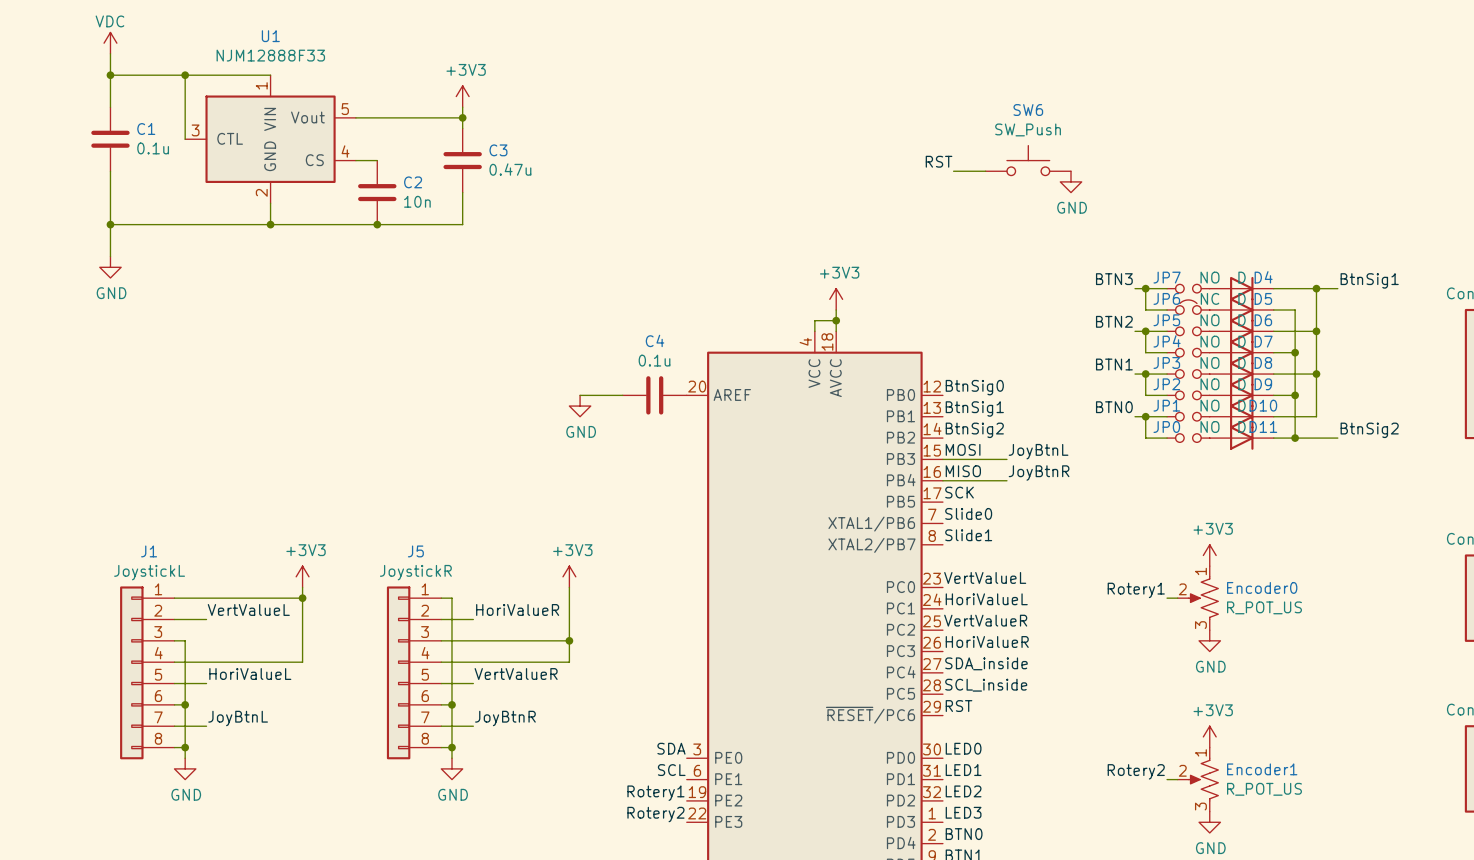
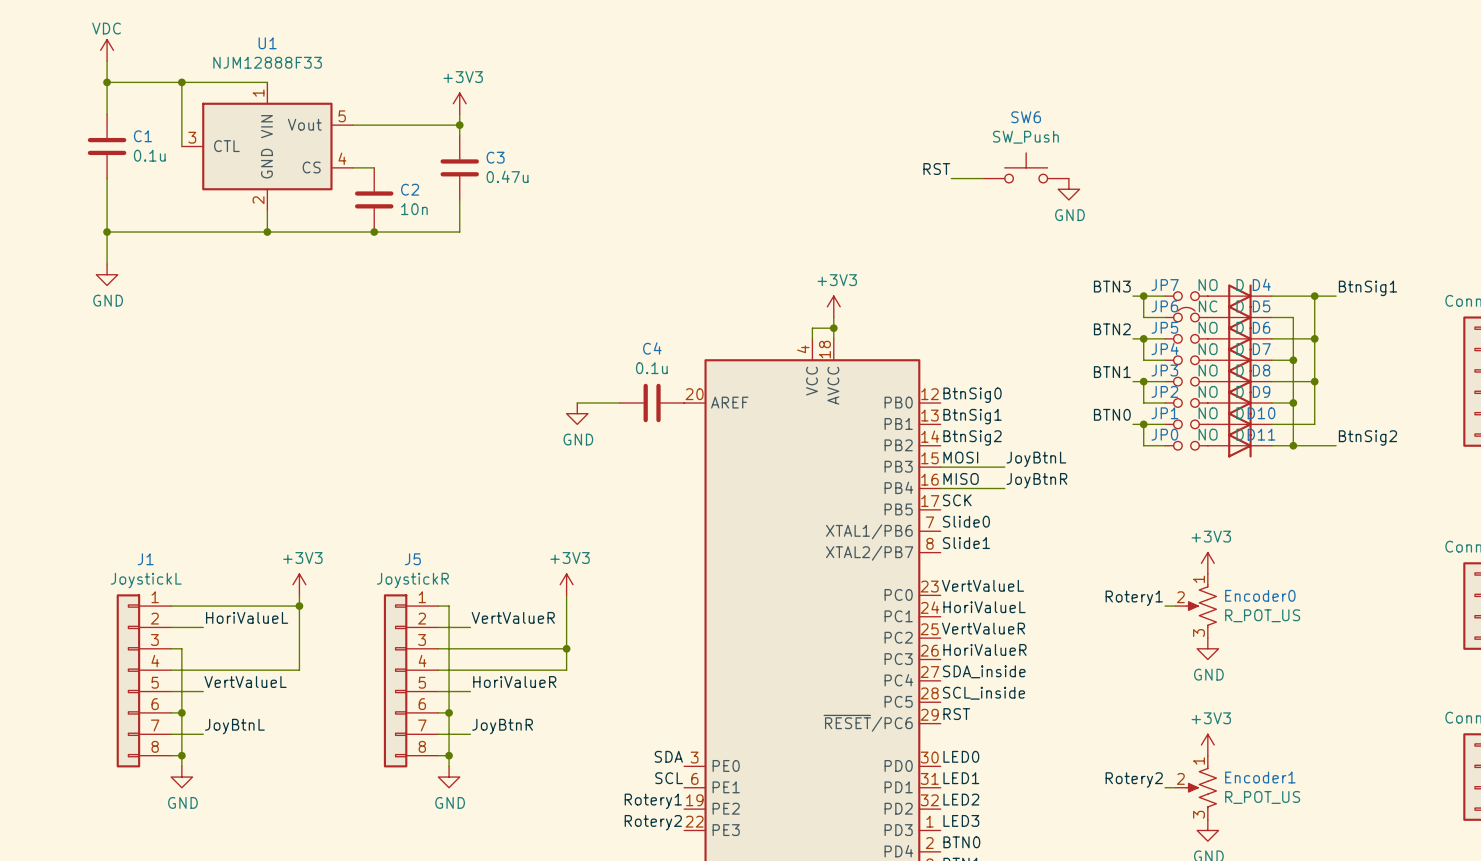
label: VertValueL (248, 609) -> HoriValueL (247, 617)
label: HoriValueR (517, 609) -> VertValueR (513, 617)
label: HoriValueL (250, 674) -> VertValueL (245, 682)
label: VertValueR (516, 674) -> HoriValueR (514, 682)

